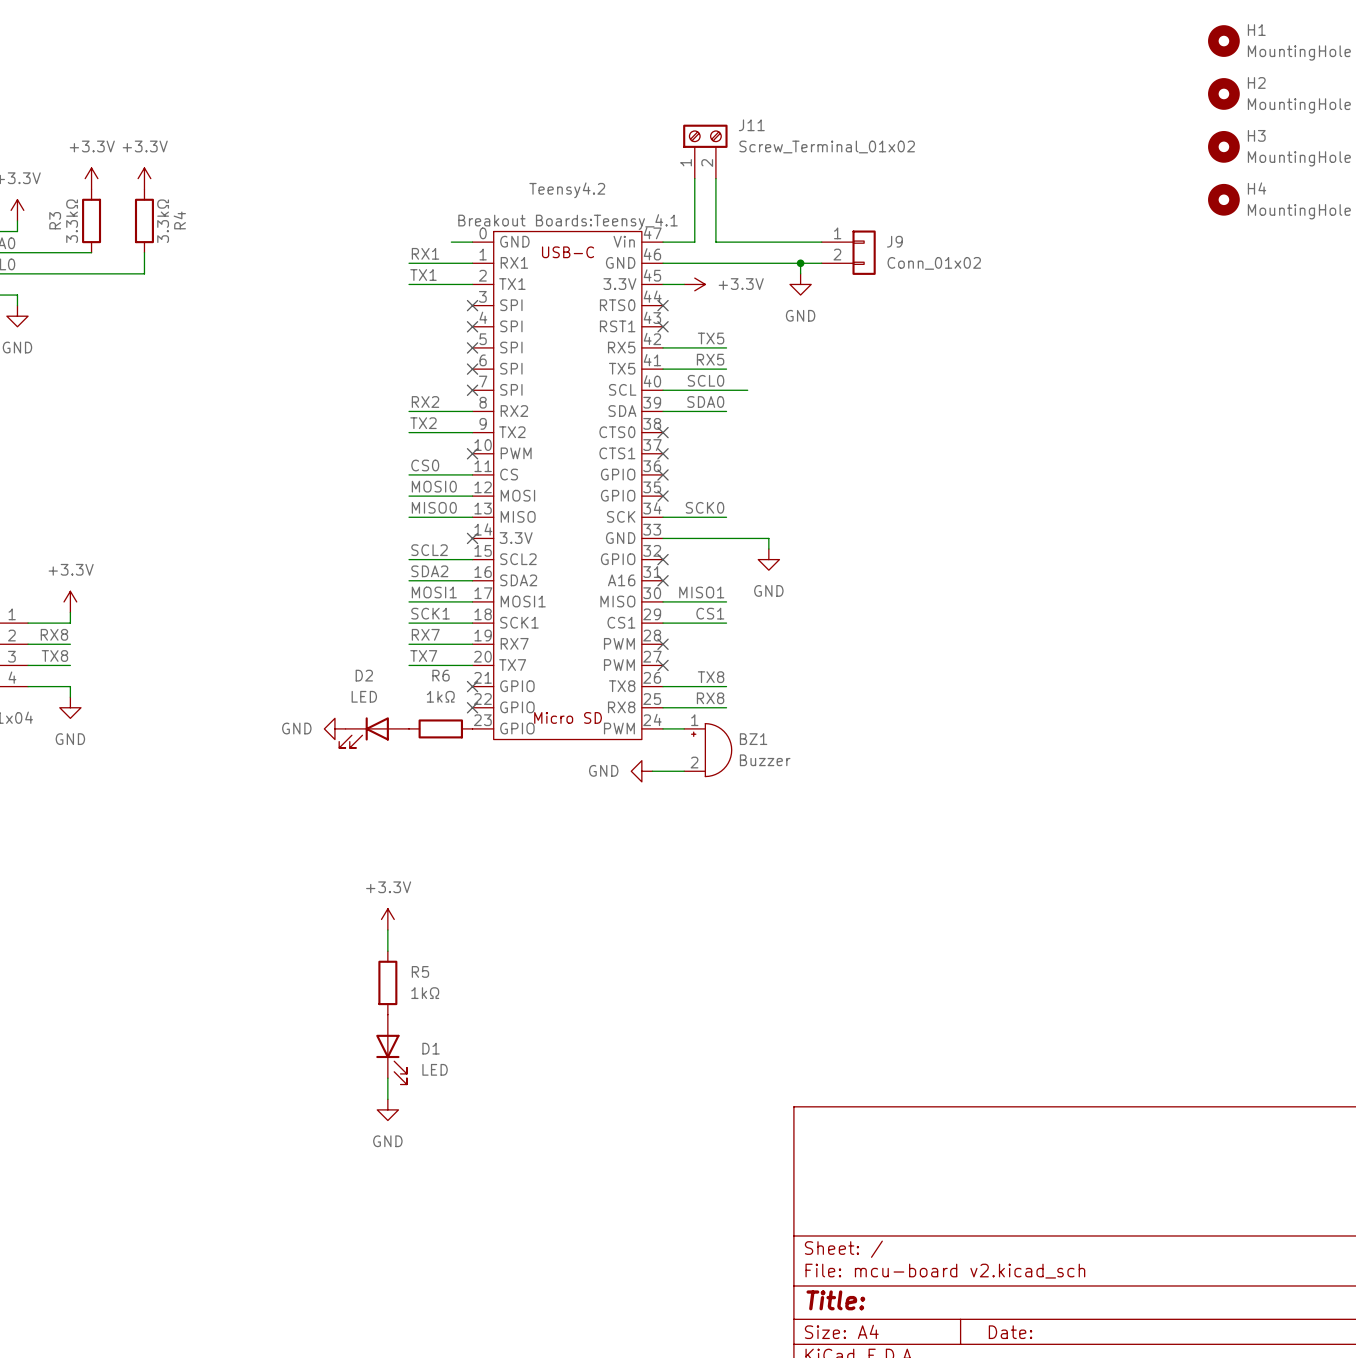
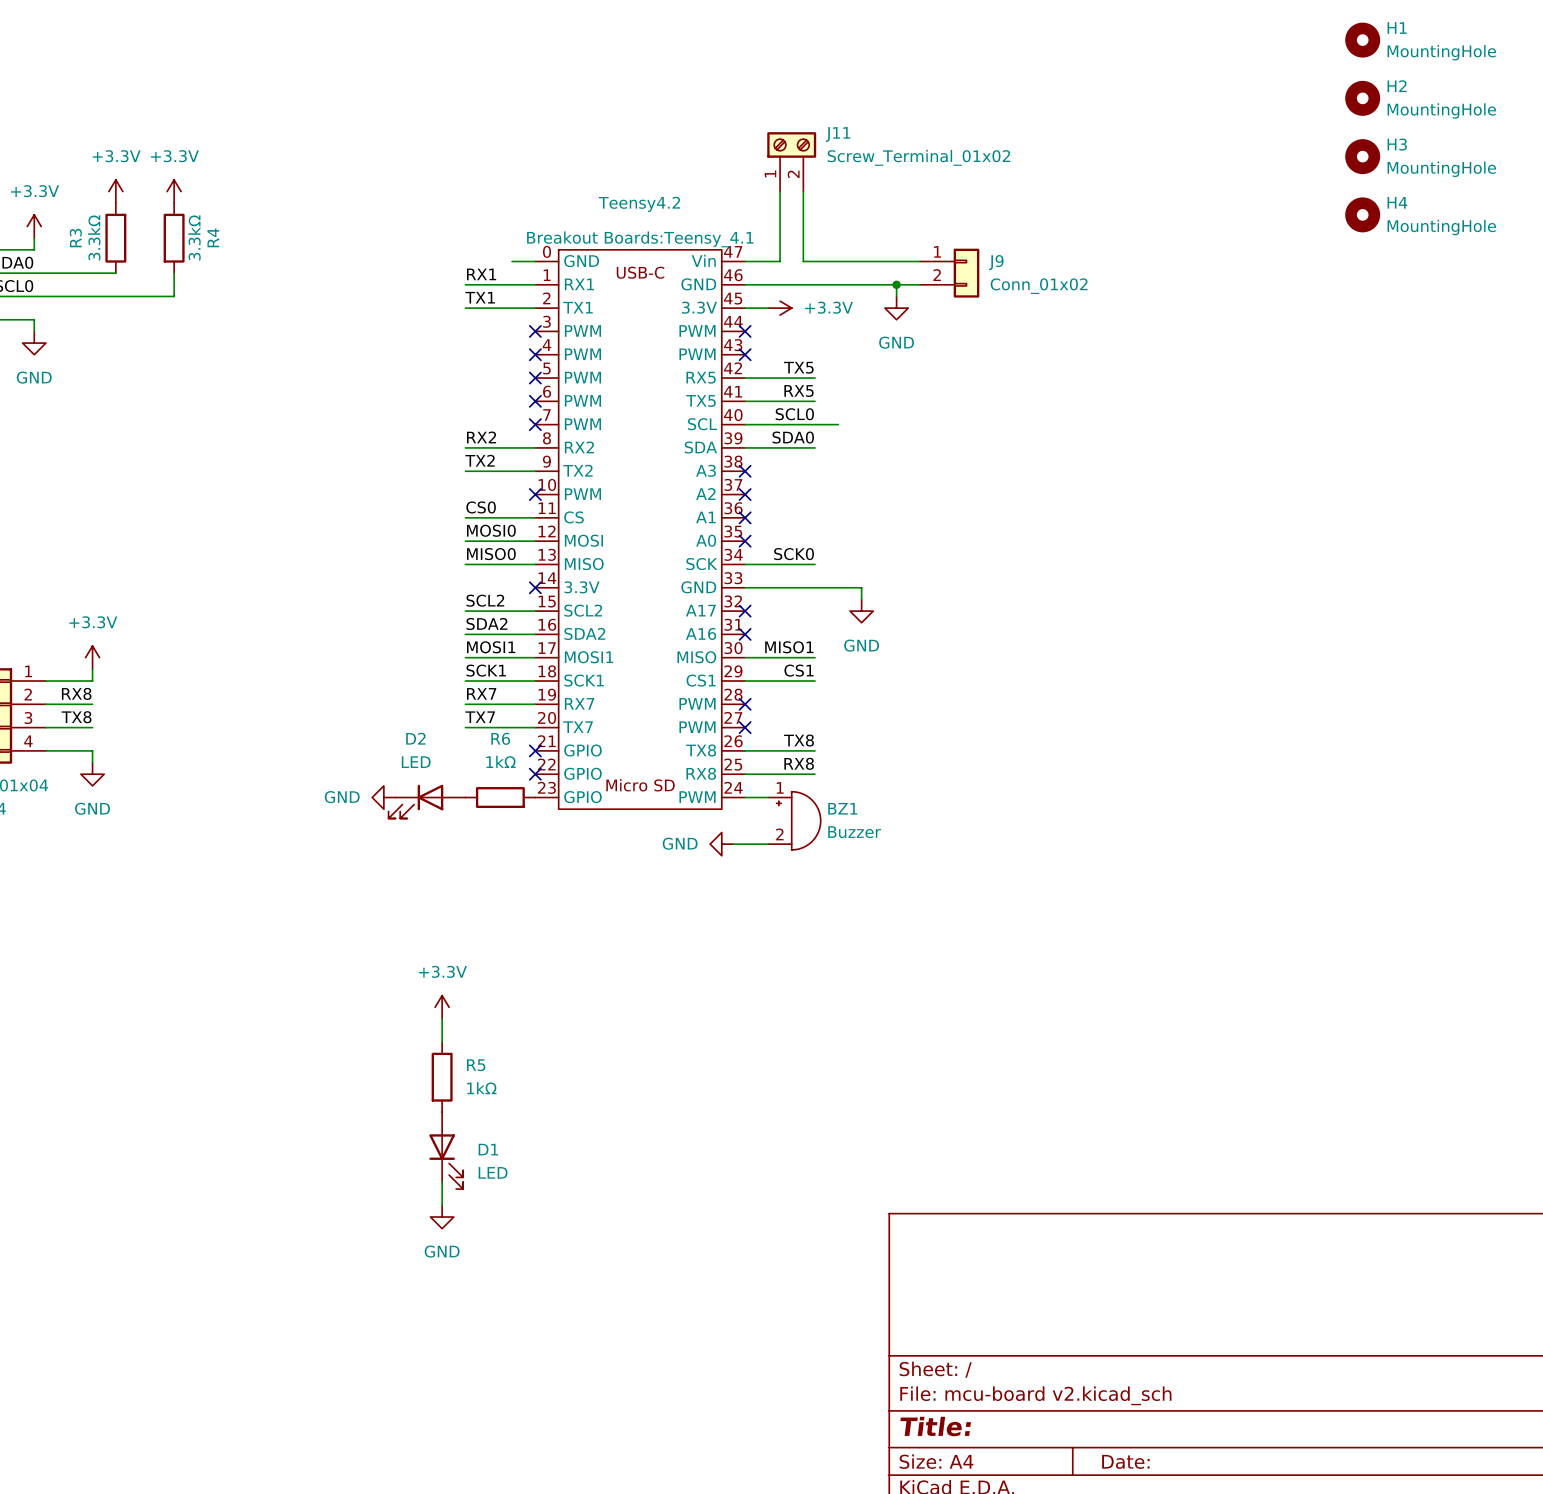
Teensy4.2 symbol: [472, 231, 664, 740] -> [535, 249, 746, 810]

